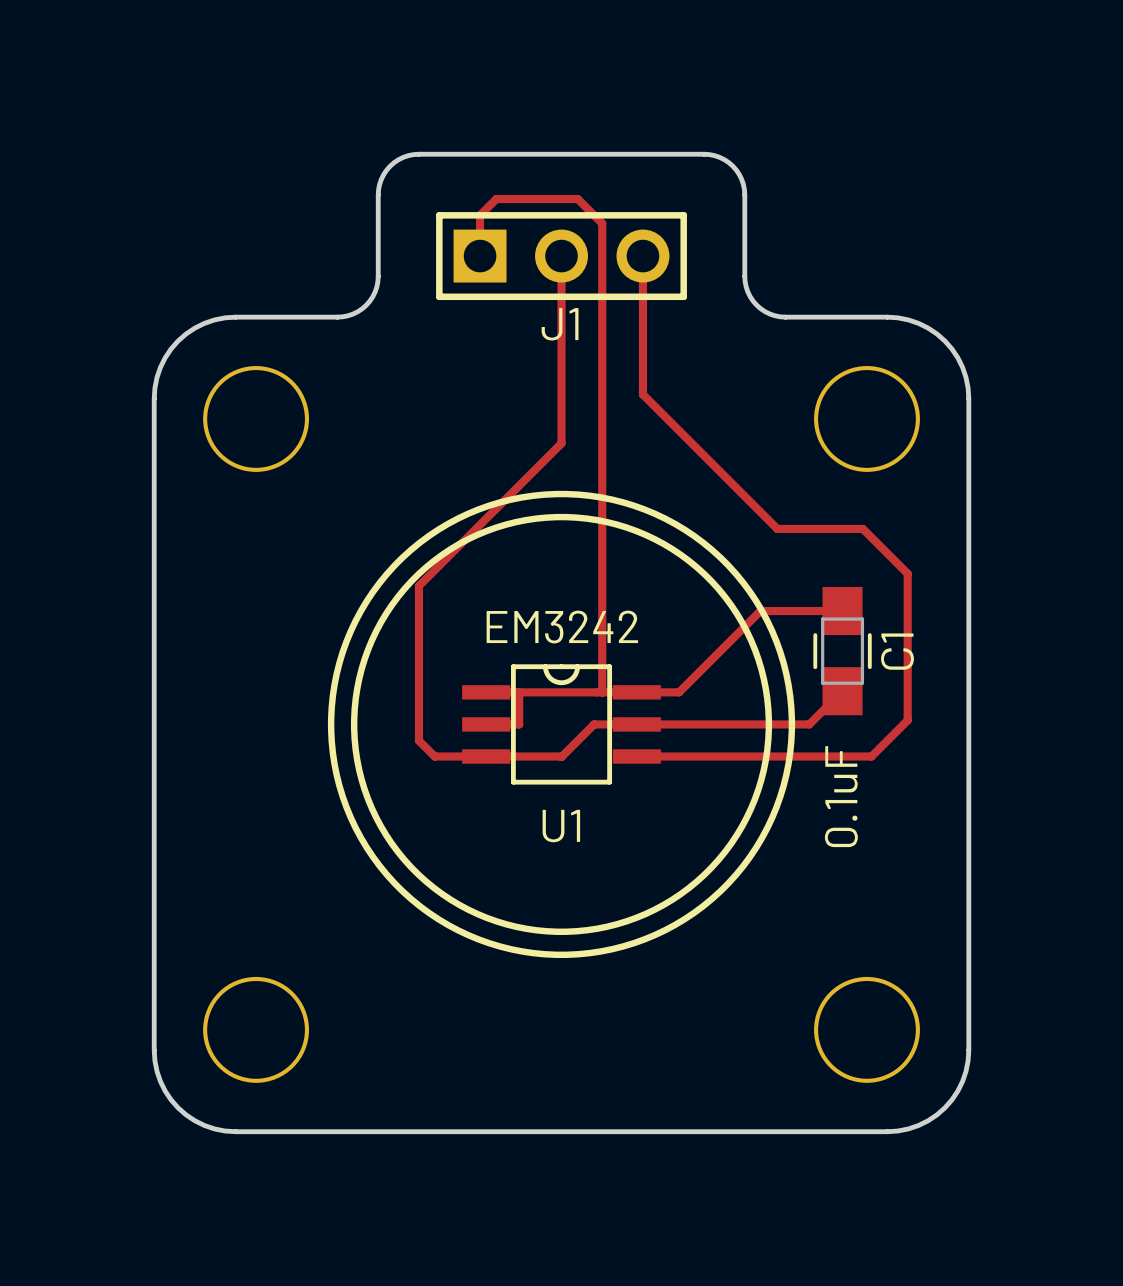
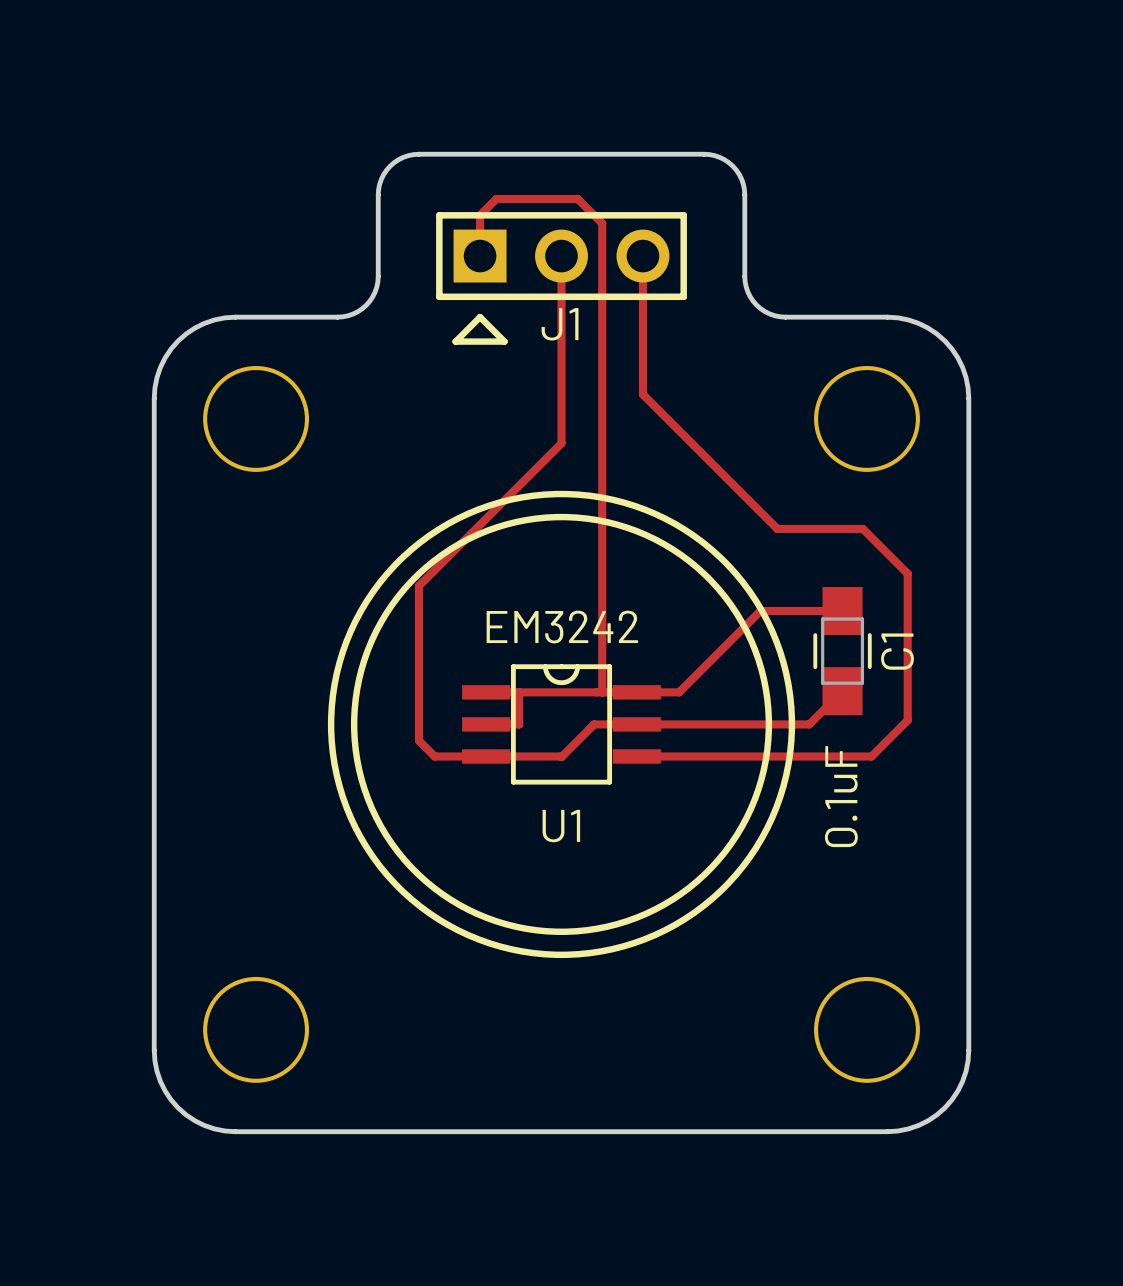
line: none -> (480, 317) (504, 341) (455, 341) (480, 317)

